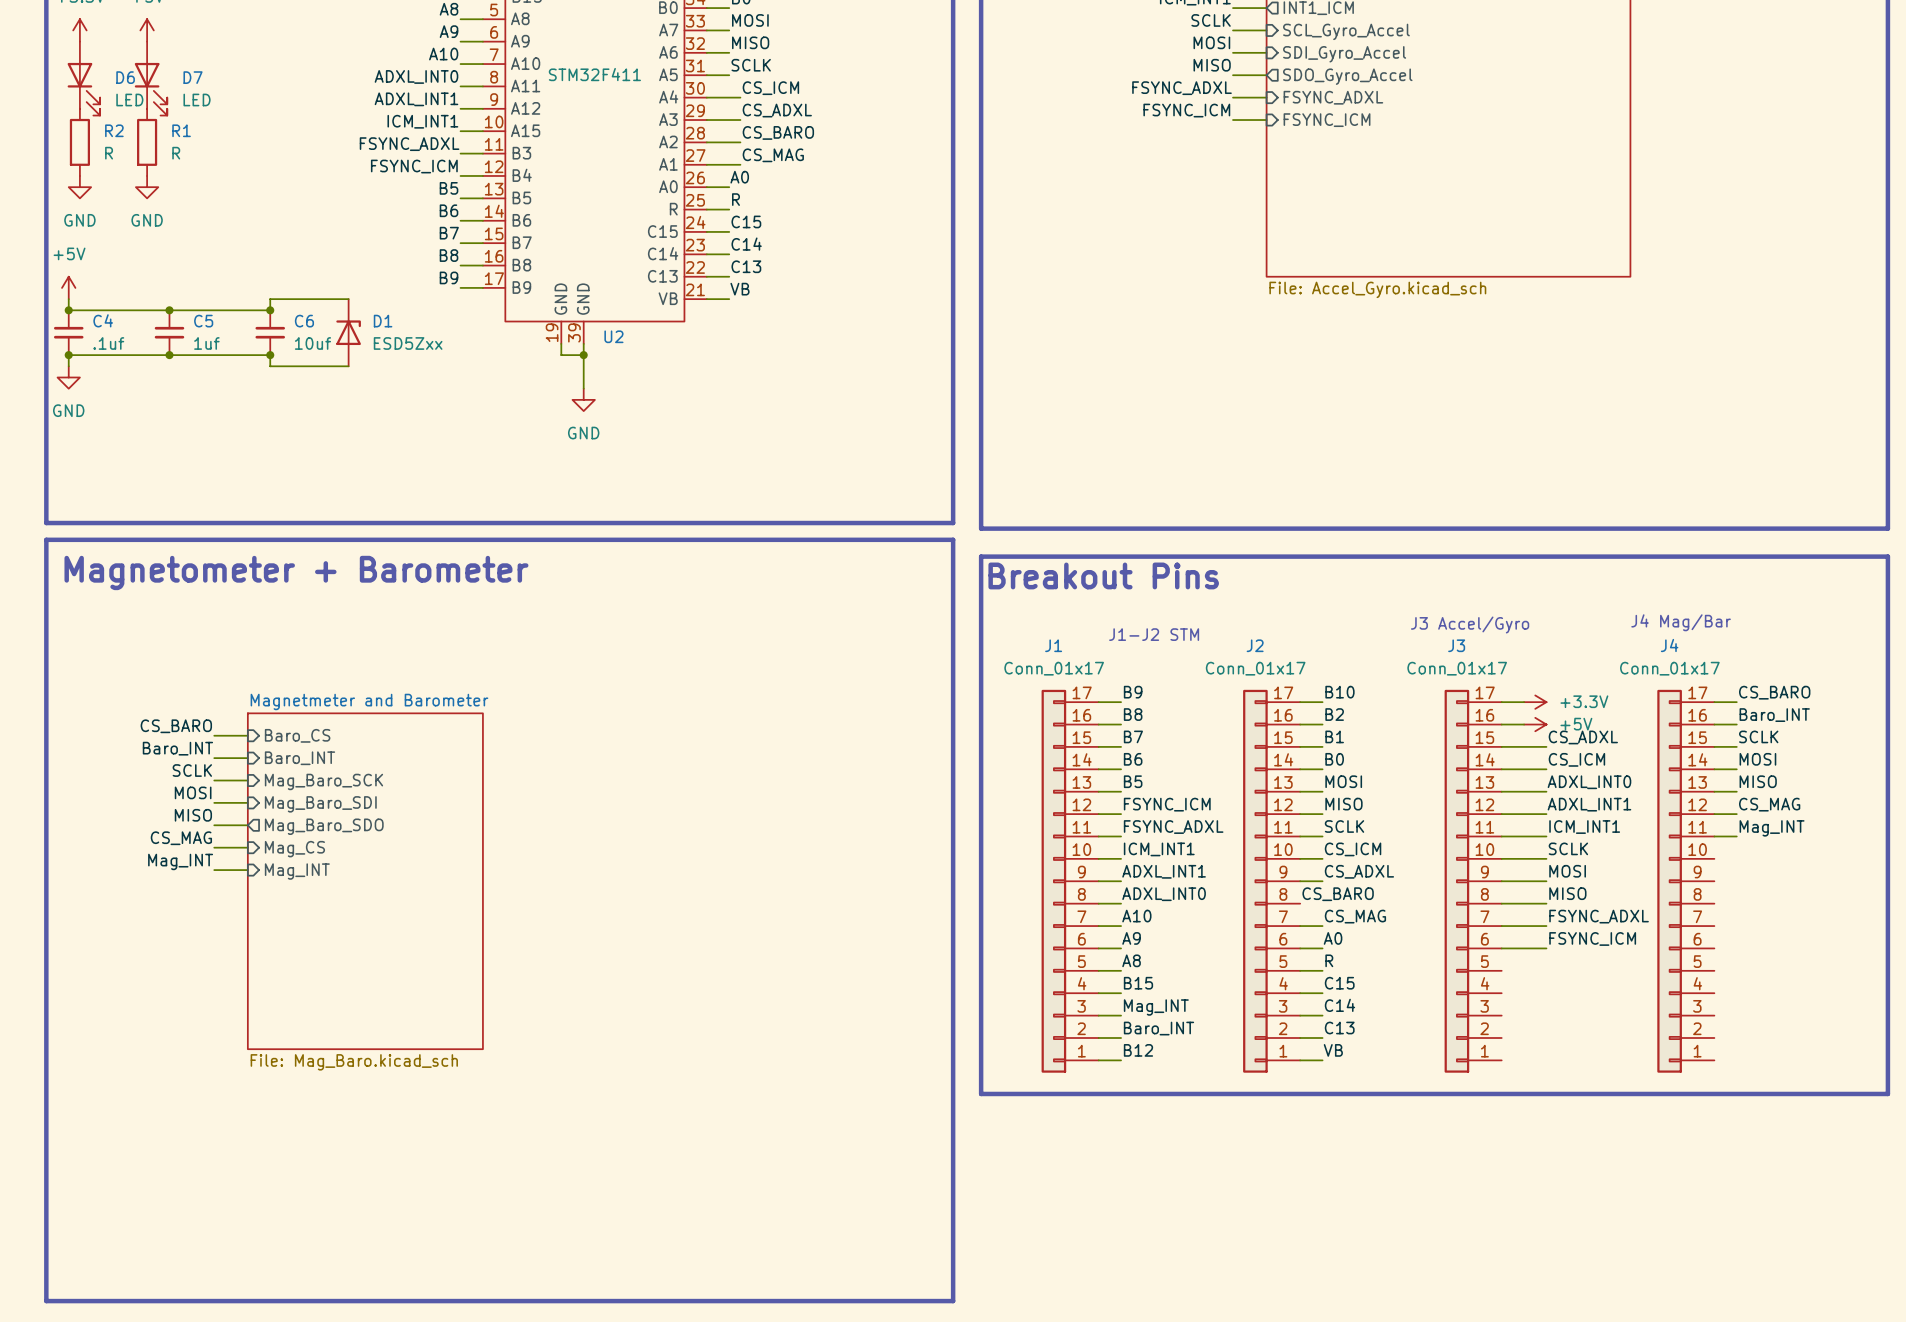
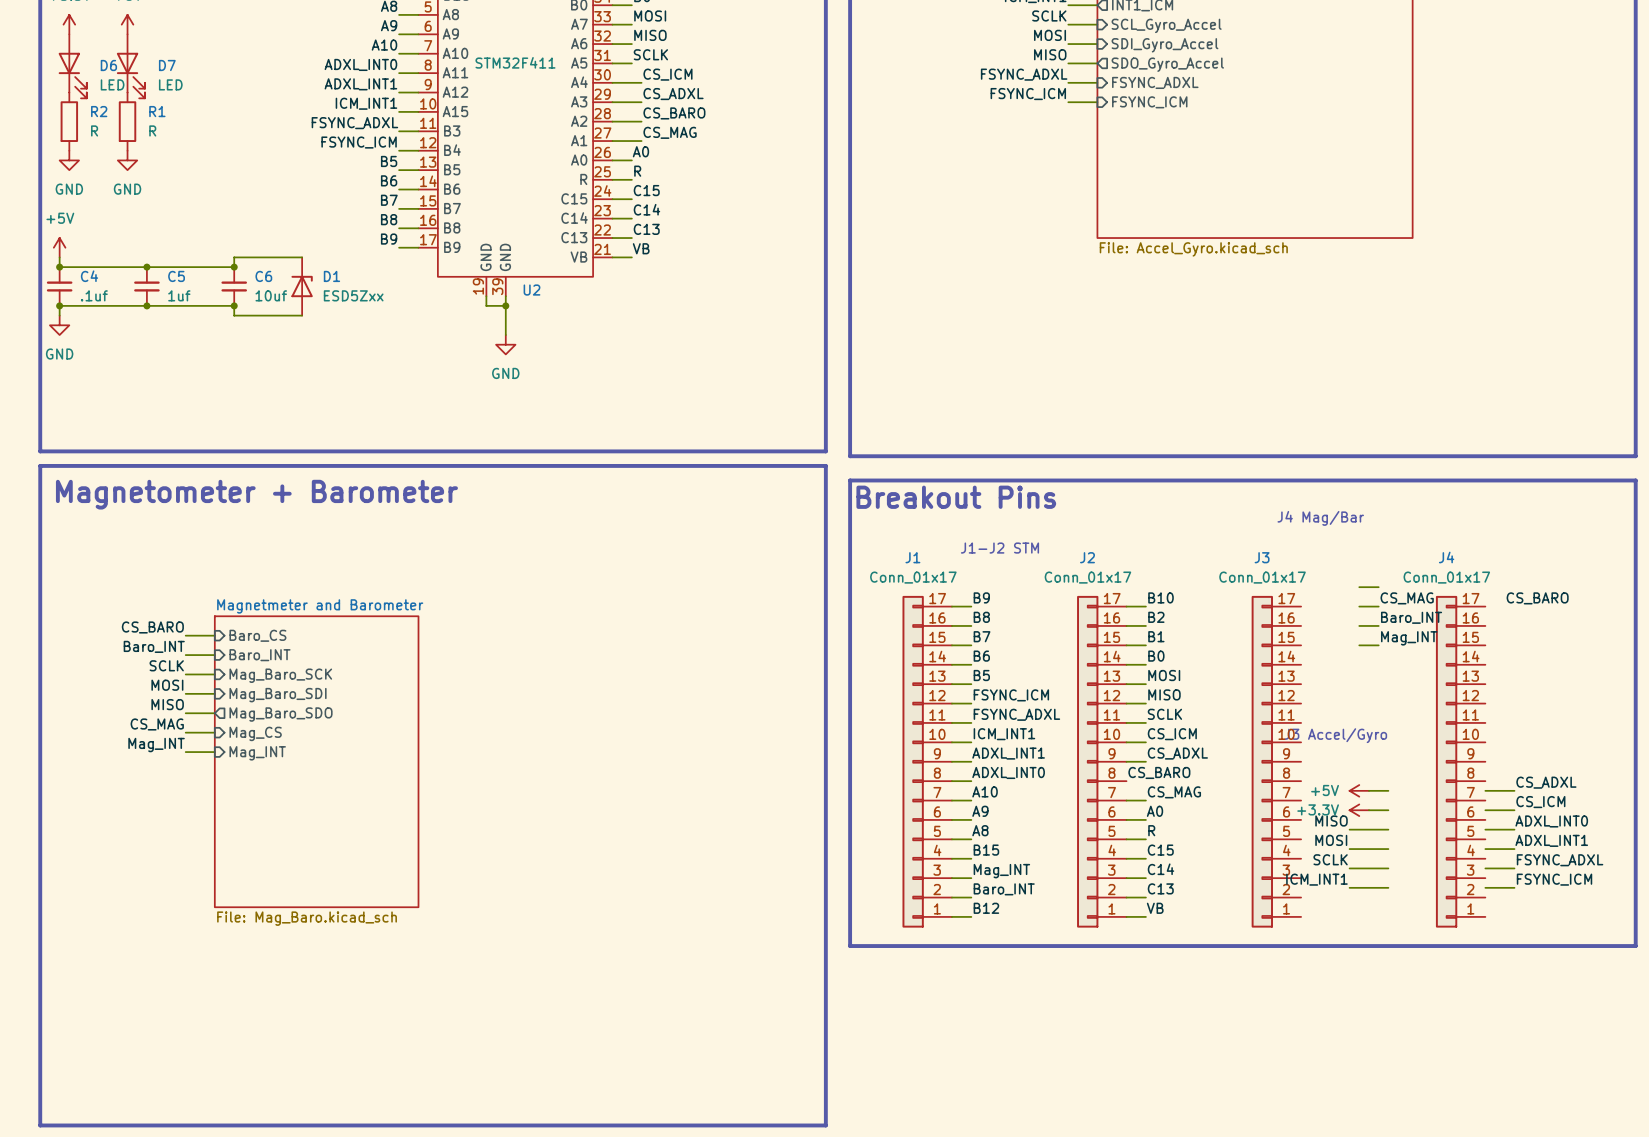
text position: J4 Mag/Bar (1681, 622) -> J4 Mag/Bar (1320, 518)
text: J3 Accel/Gyro (1470, 625) -> none
wire: (1501, 702) (1524, 702) -> none
power symbol: +3.3V (1535, 702) -> none
wire: (1714, 702) (1736, 702) -> (1359, 587) (1378, 587)
label position: Baro_INT (1774, 715) -> Baro_INT (1411, 617)
wire: (1501, 724) (1524, 724) -> none
power symbol rotation: 0° (1535, 724) -> 180° (1359, 790)
power symbol position: +5V (1535, 724) -> +5V (1359, 790)
wire: (1714, 724) (1736, 724) -> (1359, 606) (1378, 606)
label: SCLK (1758, 736) -> none
label: CS_ADXL (1583, 737) -> none
wire: (1501, 746) (1546, 746) -> none
wire: (1714, 746) (1736, 746) -> (1359, 625) (1378, 625)
label: CS_ICM (1576, 759) -> none
label: MOSI (1757, 759) -> none
wire: (1501, 769) (1546, 769) -> none
wire: (1714, 769) (1736, 769) -> (1359, 645) (1378, 645)
label: MISO (1758, 781) -> none
label: ADXL_INT0 (1589, 782) -> none
wire: (1501, 791) (1546, 791) -> none
wire: (1714, 791) (1736, 791) -> none
label: ADXL_INT1 (1589, 804) -> none
label position: CS_MAG (1769, 804) -> CS_MAG (1407, 598)
wire: (1501, 814) (1546, 814) -> none
wire: (1714, 814) (1736, 814) -> (1368, 790) (1388, 790)
label position: ICM_INT1 (1584, 827) -> ICM_INT1 (1316, 879)
label position: Mag_INT (1772, 828) -> Mag_INT (1409, 638)
wire: (1501, 836) (1546, 836) -> none
wire: (1714, 836) (1736, 836) -> (1368, 810) (1388, 810)
label position: SCLK (1568, 848) -> SCLK (1330, 859)
text: none -> J3 Accel/Gyro (1335, 735)
wire: (1501, 858) (1546, 858) -> none
label position: MOSI (1567, 871) -> MOSI (1331, 840)
wire: (1501, 881) (1546, 881) -> (1349, 829) (1388, 829)
label position: MISO (1567, 893) -> MISO (1331, 821)
wire: (1501, 903) (1546, 903) -> (1349, 849) (1388, 849)
label: none -> CS_ADXL (1546, 782)
wire: none -> (1485, 790) (1514, 790)
label position: FSYNC_ADXL (1599, 916) -> FSYNC_ADXL (1560, 860)
wire: (1501, 926) (1546, 926) -> (1349, 868) (1388, 868)
label: none -> CS_ICM (1540, 802)
power symbol: none -> +3.3V (1359, 810)
wire: none -> (1485, 810) (1514, 810)
label position: FSYNC_ICM (1592, 938) -> FSYNC_ICM (1554, 879)
wire: (1501, 948) (1546, 948) -> (1349, 887) (1388, 887)
label: none -> ADXL_INT0 (1551, 821)
wire: none -> (1485, 829) (1514, 829)
label: none -> ADXL_INT1 (1551, 840)
wire: none -> (1485, 849) (1514, 849)
wire: none -> (1485, 868) (1514, 868)
wire: none -> (1485, 887) (1514, 887)

